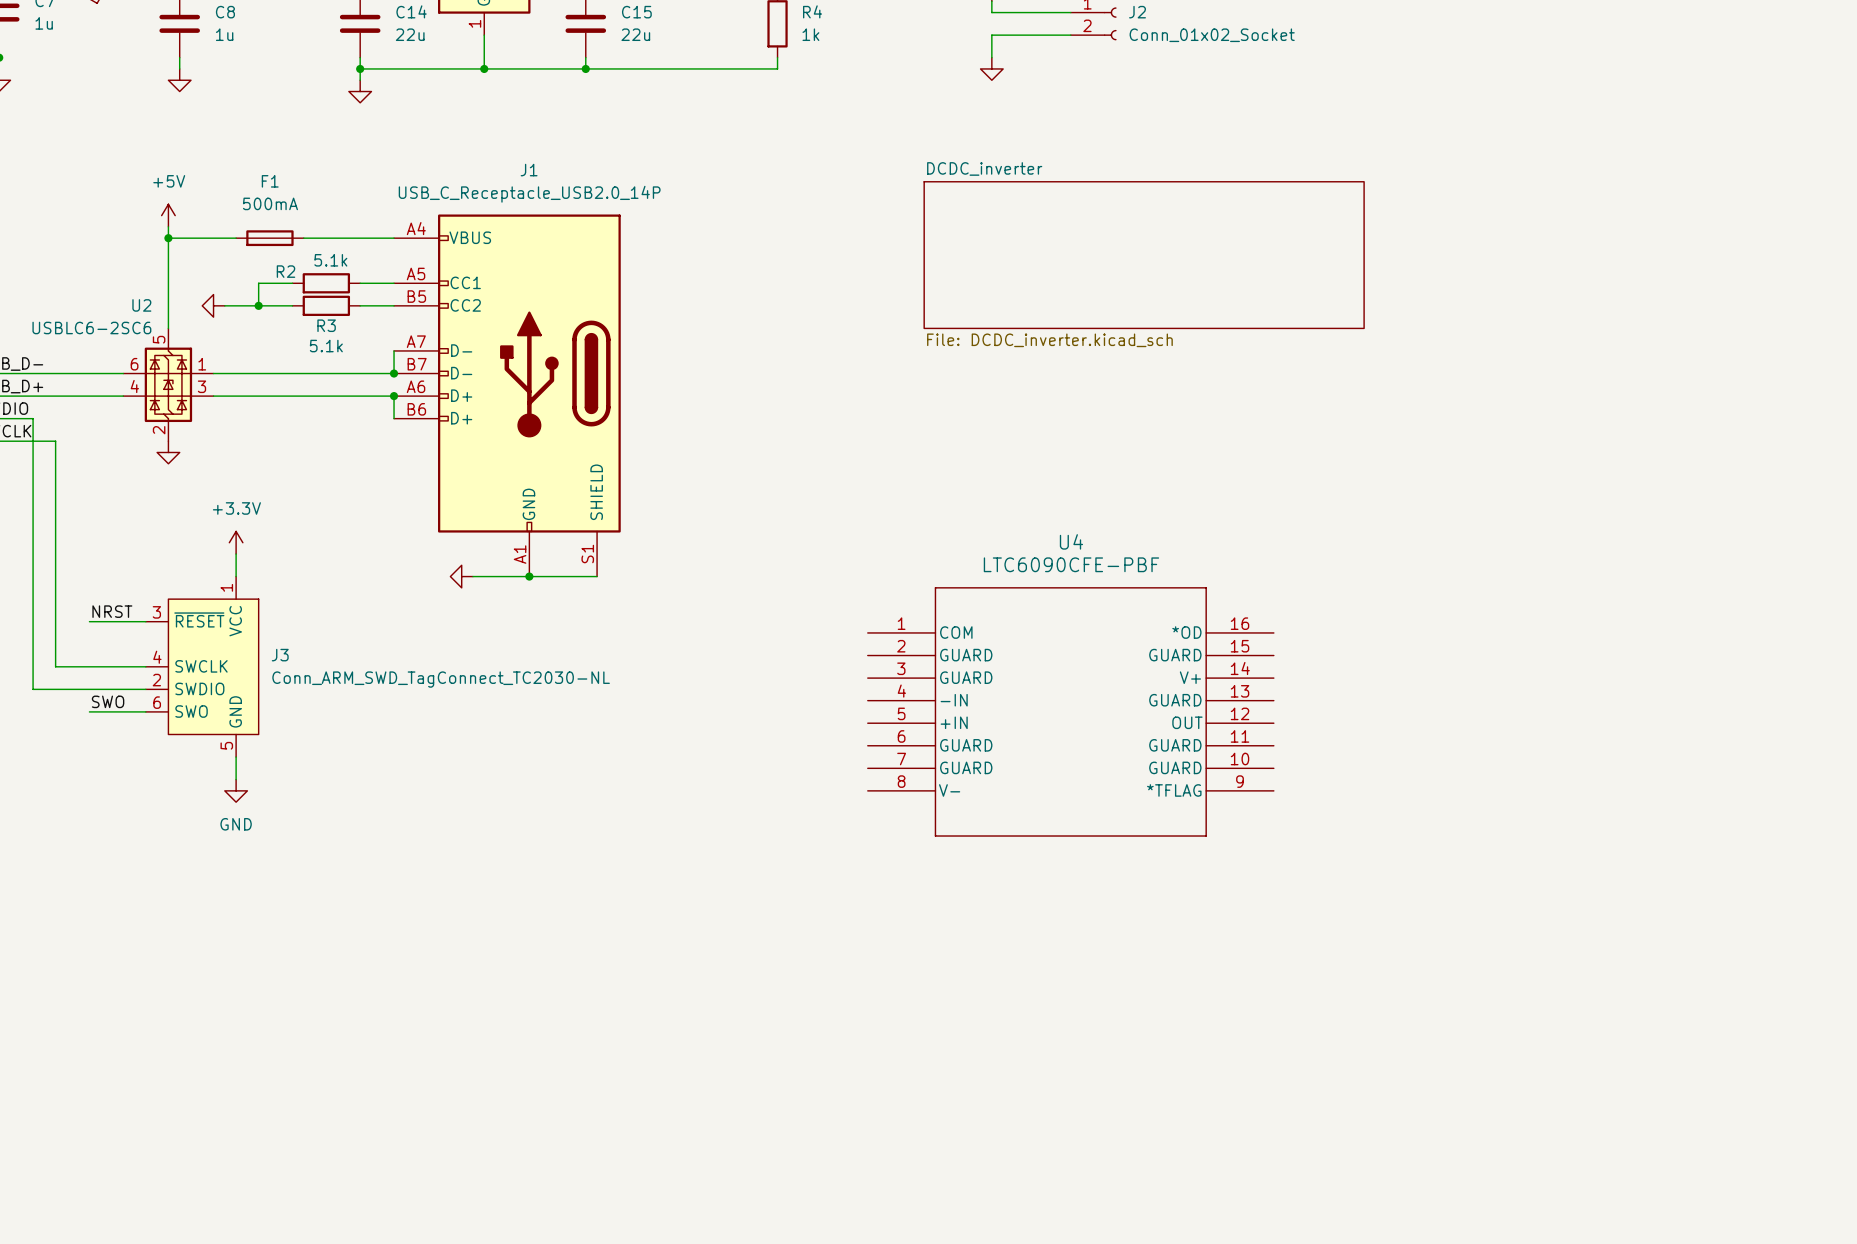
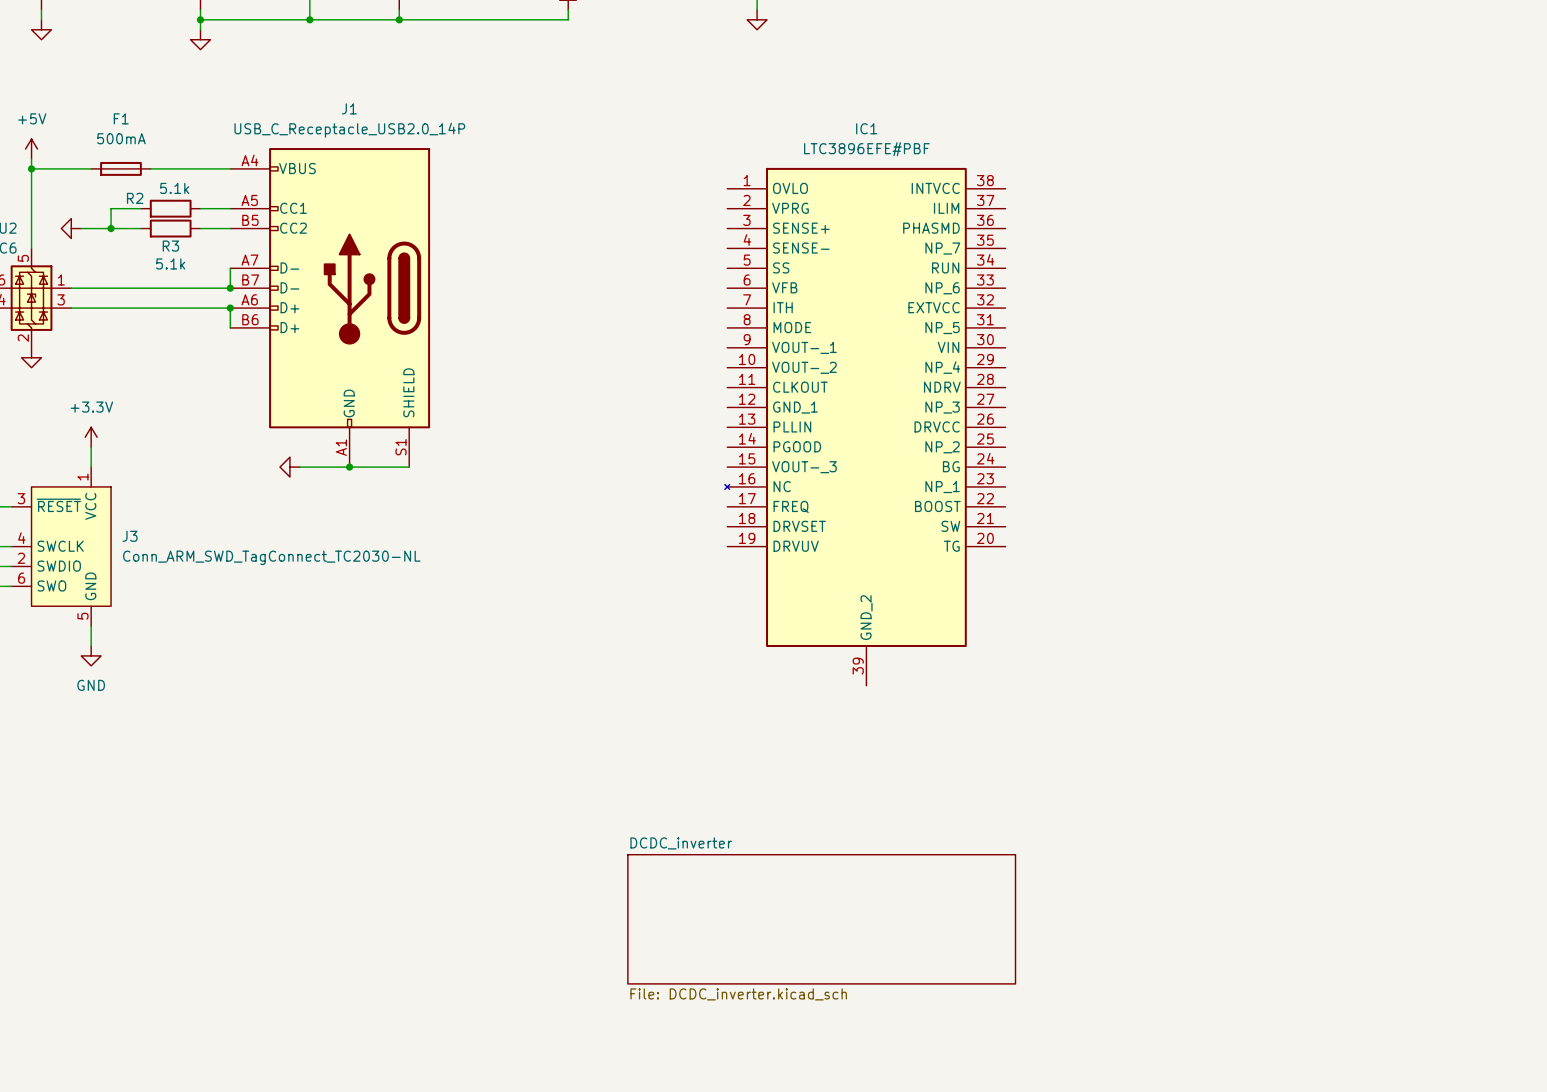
sheet DCDC_inverter: File: DCDC_inverter.kicad_sch (1144, 255) -> none
IC1: none -> LTC3896EFE#PBF (865, 426)
U4: LTC6090CFE-PBF (1070, 711) -> none
sheet DCDC_inverter: none -> File: DCDC_inverter.kicad_sch (821, 919)

